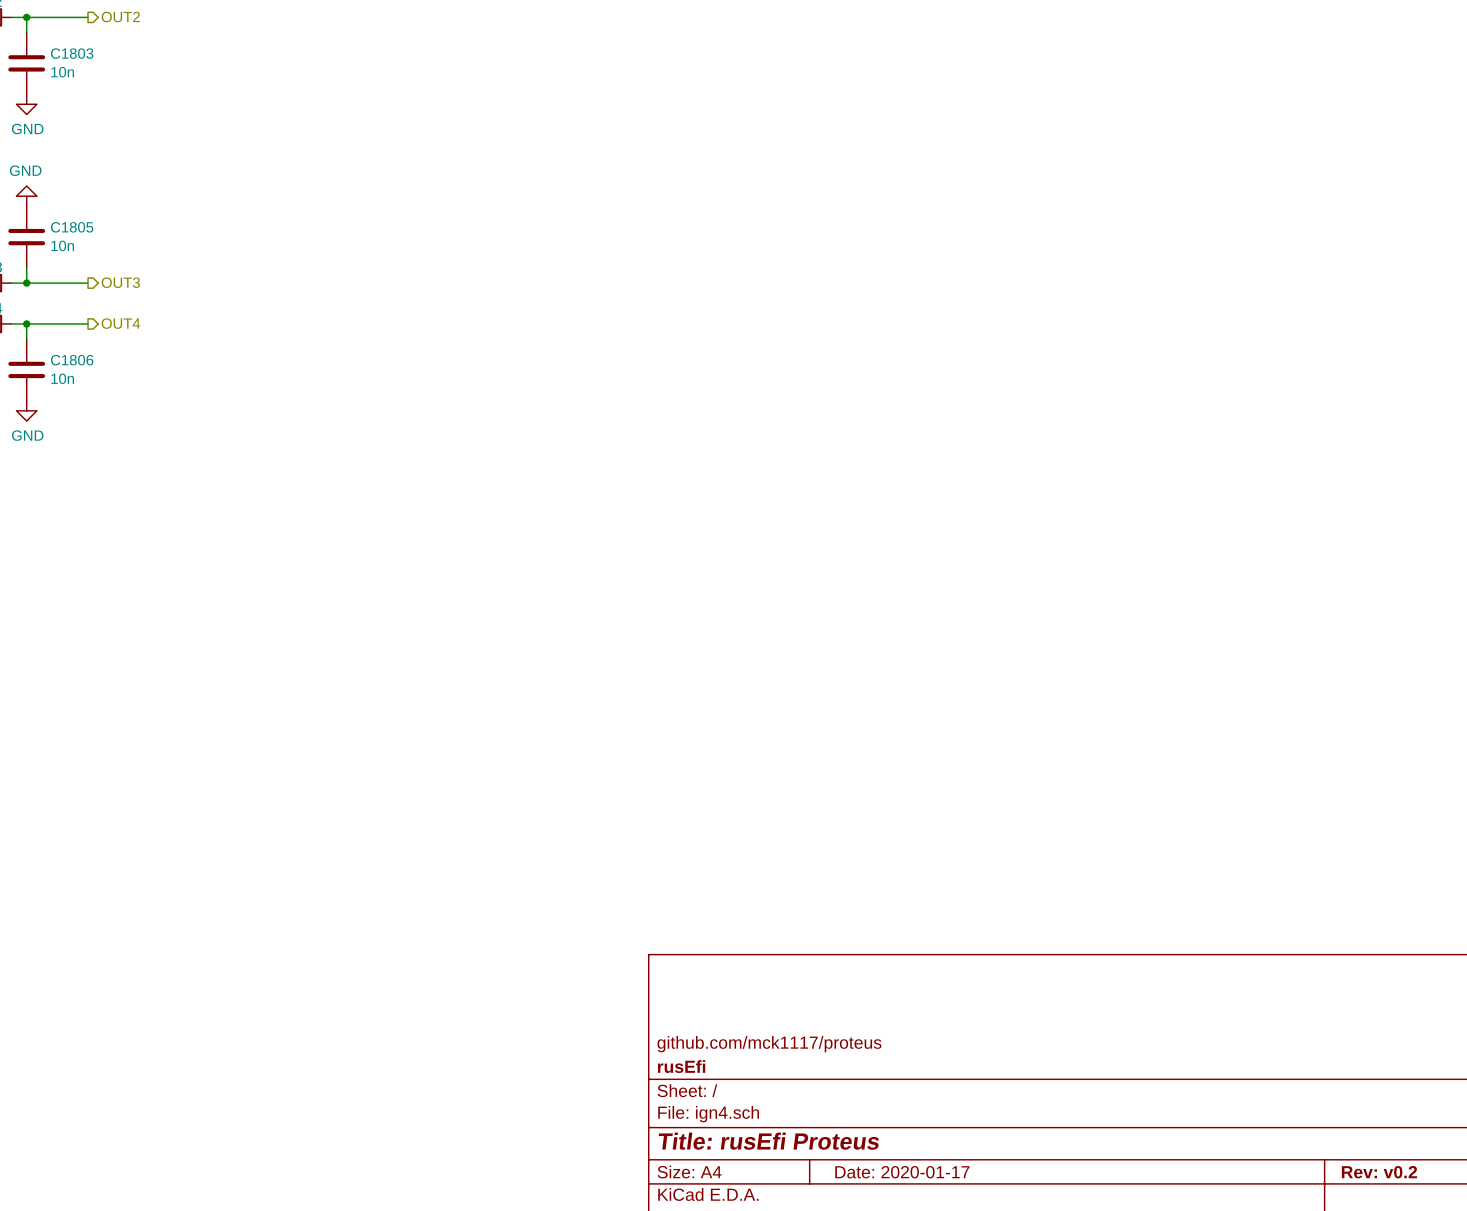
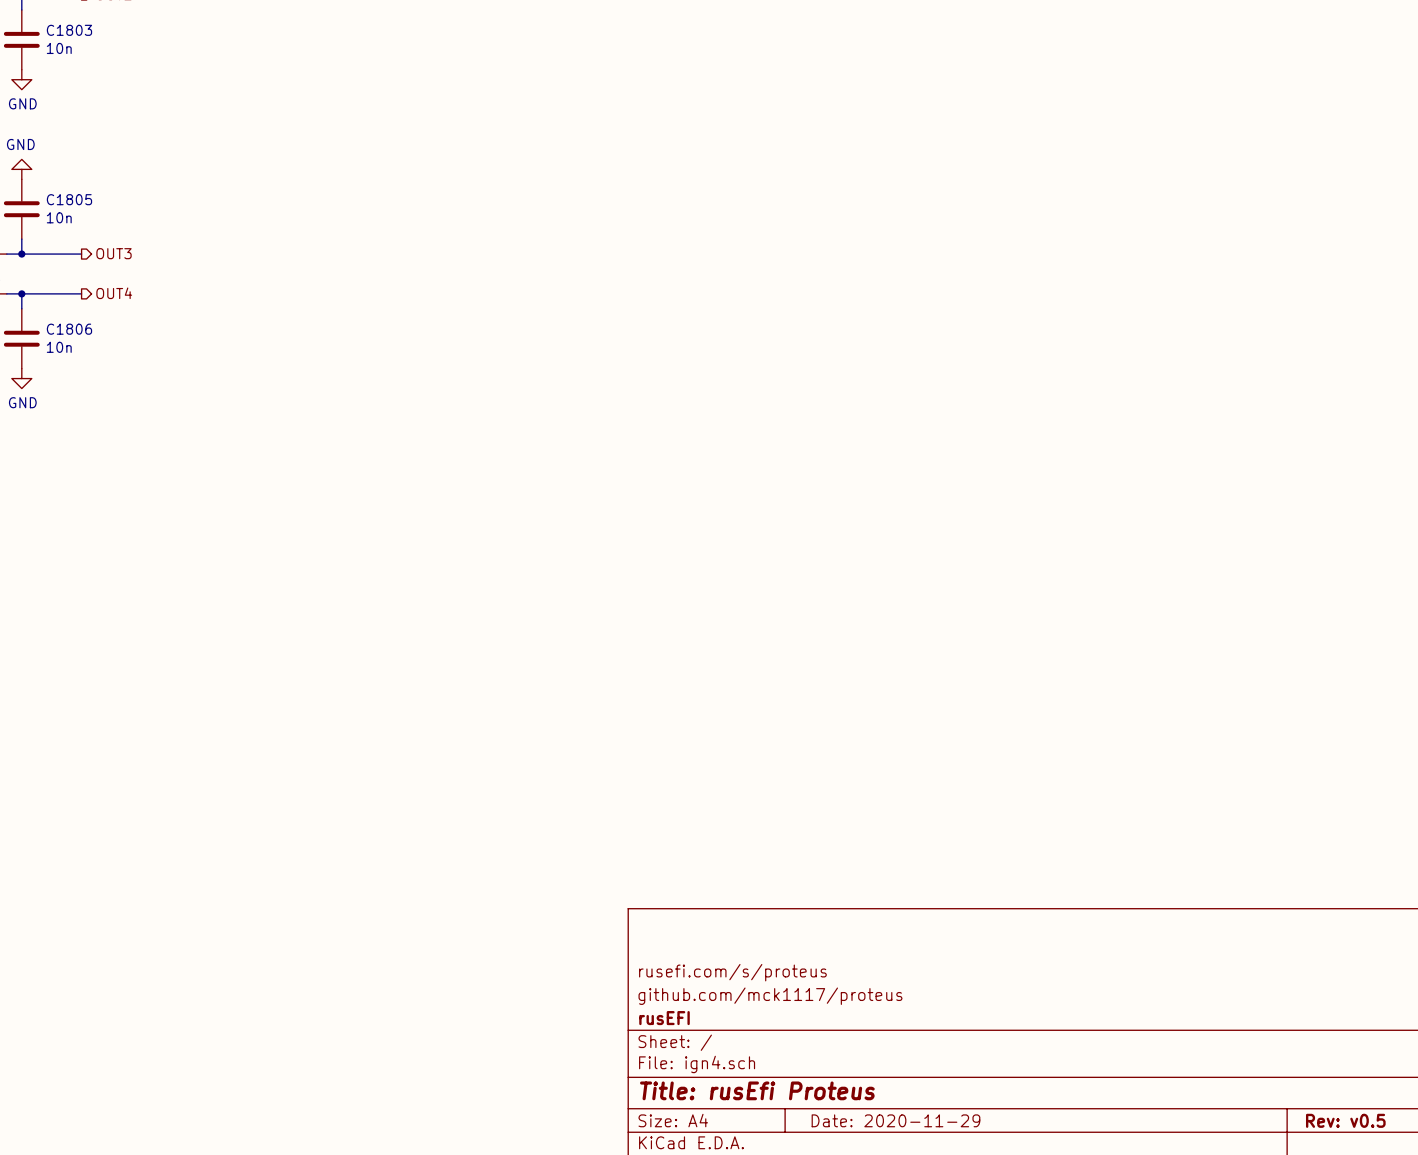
title block: none -> rusefi.com/s/proteus (732, 972)
title block: rusEfi (681, 1066) -> rusEFI (664, 1018)
title block: Date: 2020-01-17 (902, 1172) -> Date: 2020-11-29 (895, 1120)
title block: Rev: v0.2 (1379, 1172) -> Rev: v0.5 (1345, 1120)

